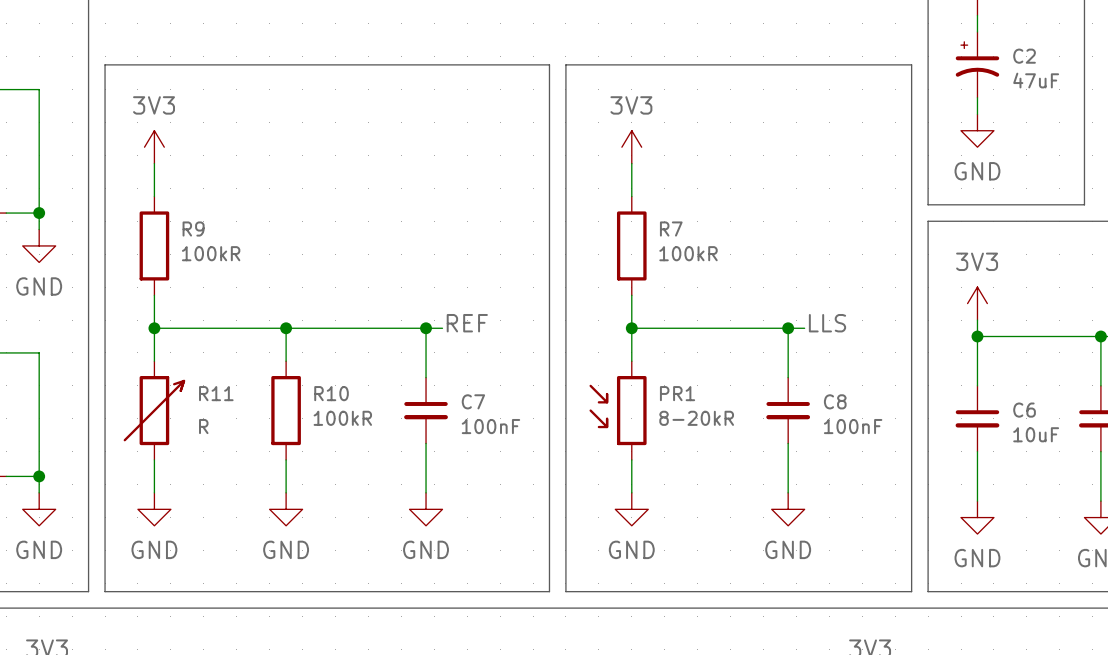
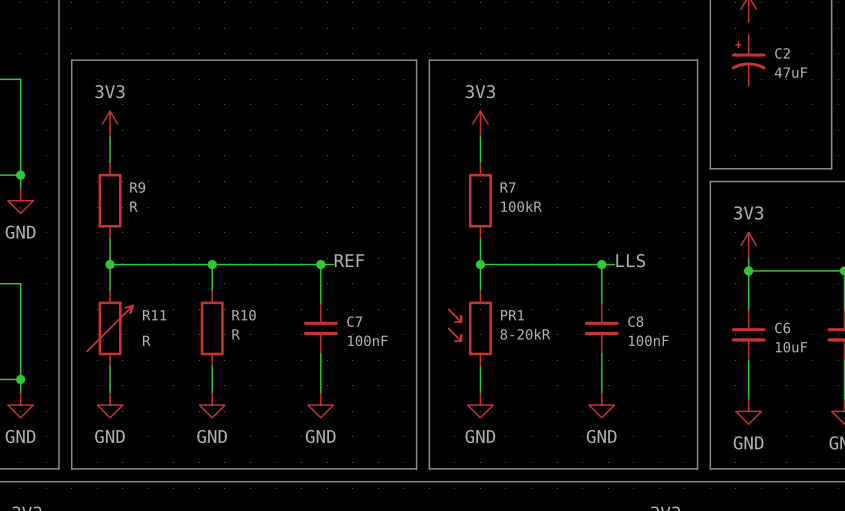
wire: (977, 15) (977, 31) -> none
wire: (977, 97) (977, 114) -> none
power symbol: GND (977, 130) -> none
R9 value: 100kR (211, 253) -> R (133, 206)
R10 value: 100kR (342, 418) -> R (236, 334)

